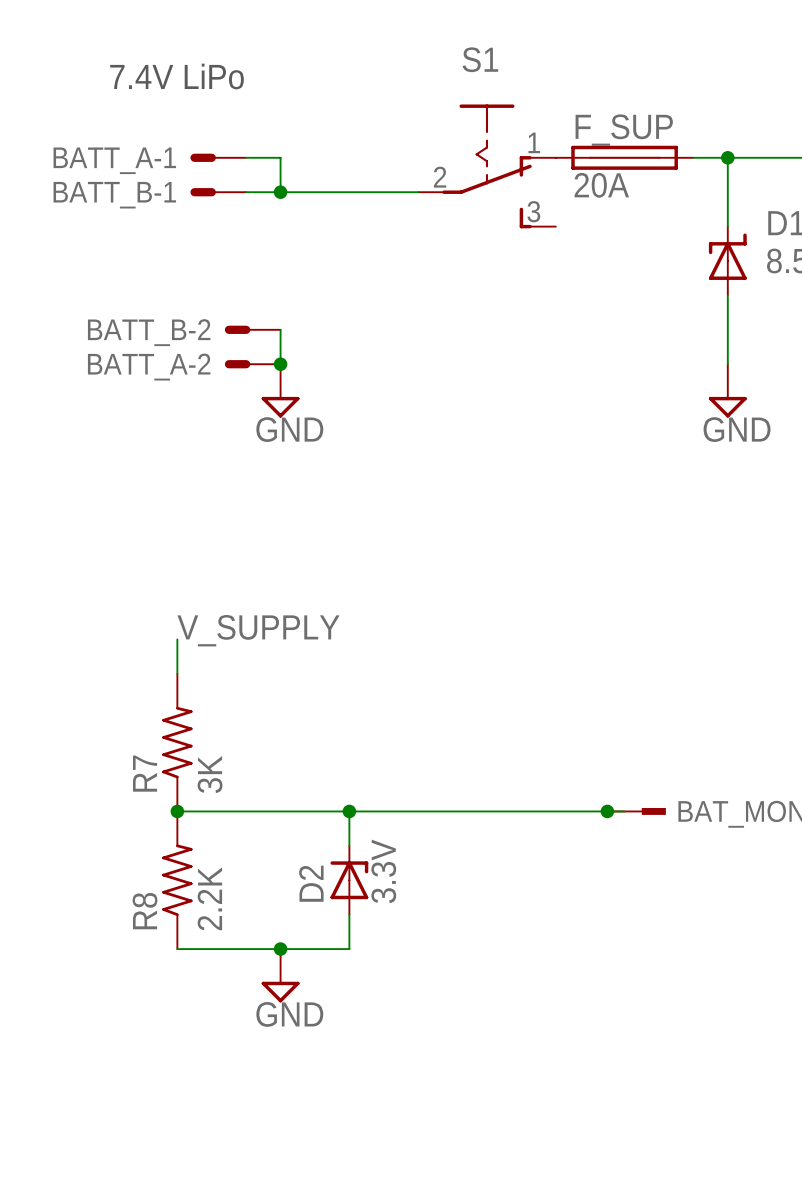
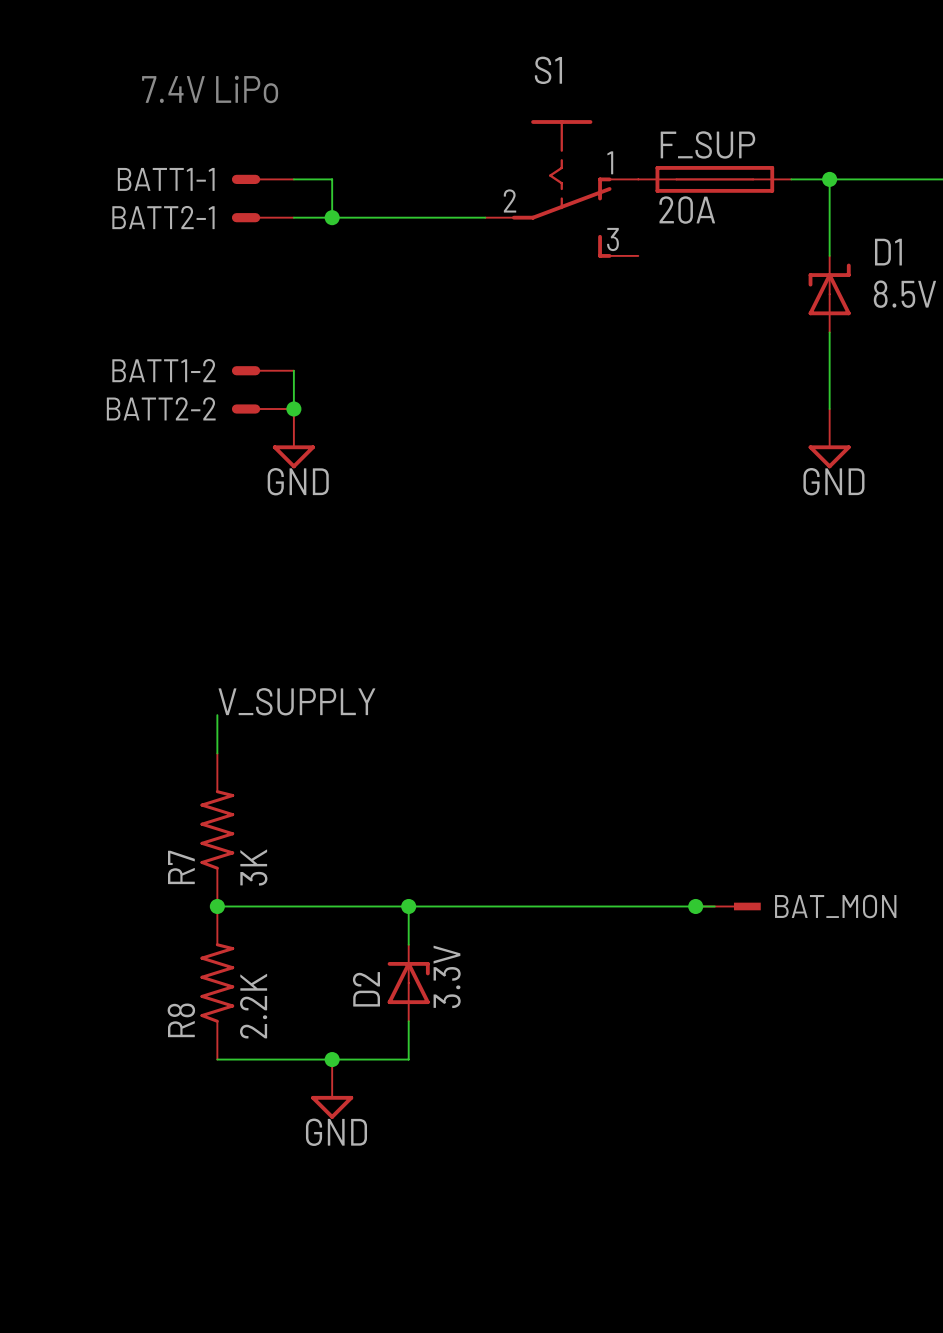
BATT_A-1 name: BATT_A-1 (114, 160) -> BATT1-1 (166, 179)
BATT_B-1 name: BATT_B-1 (114, 195) -> BATT2-1 (163, 217)
BATT1-2: none -> (262, 370)
BATT_B-2: (252, 329) -> none
wire: (280, 329) (280, 364) -> (293, 370) (293, 409)
BATT2-2: none -> (262, 409)
BATT_A-2: (252, 364) -> none
junction position: (280, 364) -> (293, 409)
power symbol position: GND (280, 390) -> GND (293, 438)

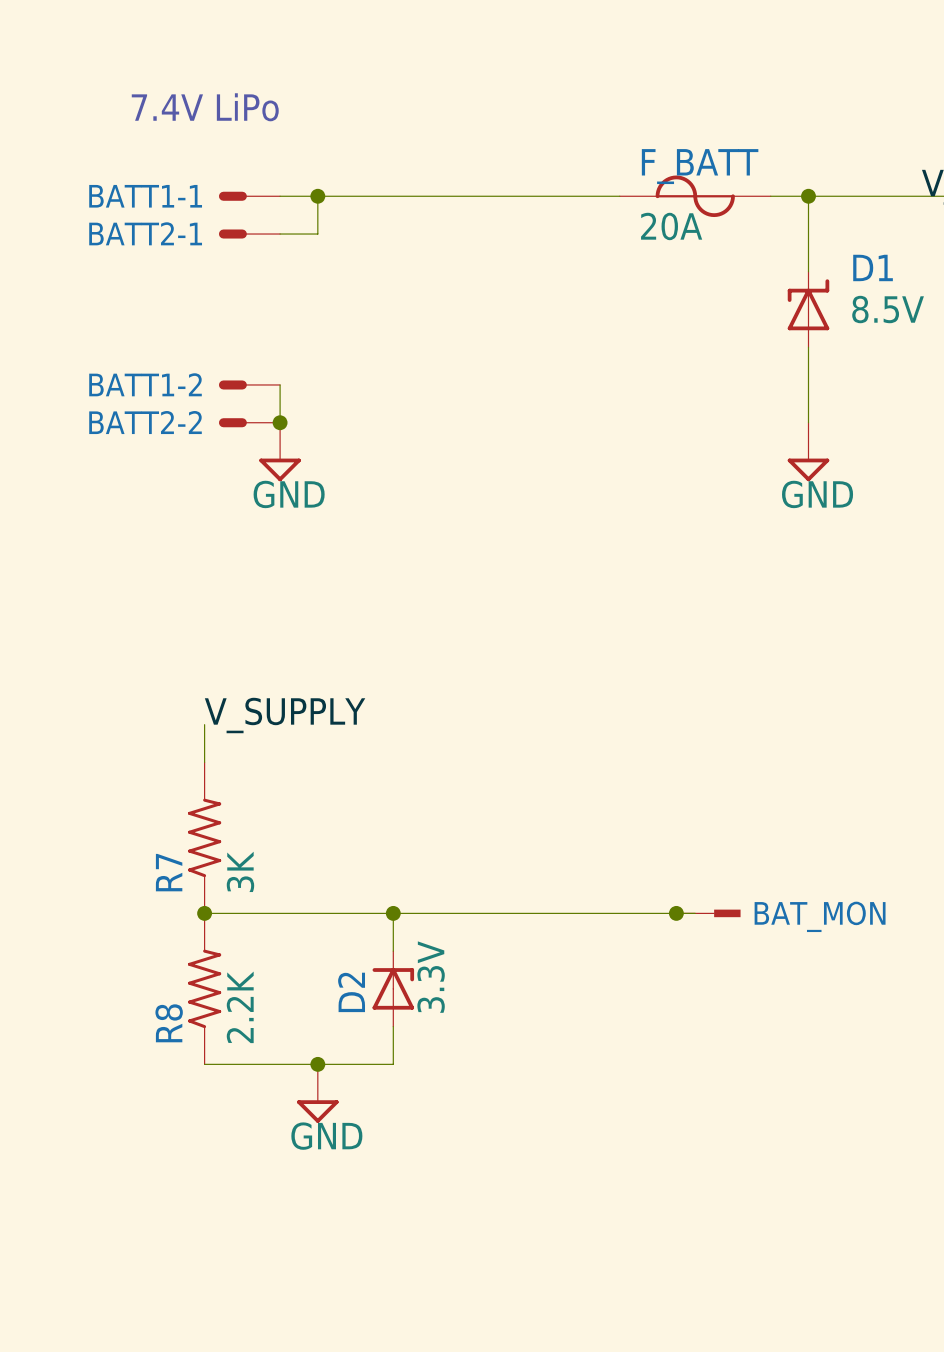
wire: none -> (317, 196) (619, 196)
F_SUP: 20A (714, 179) -> none
F_BATT: none -> 20A (695, 196)
S1: (561, 188) -> none
wire: (332, 217) (485, 217) -> none
junction position: (332, 217) -> (317, 196)

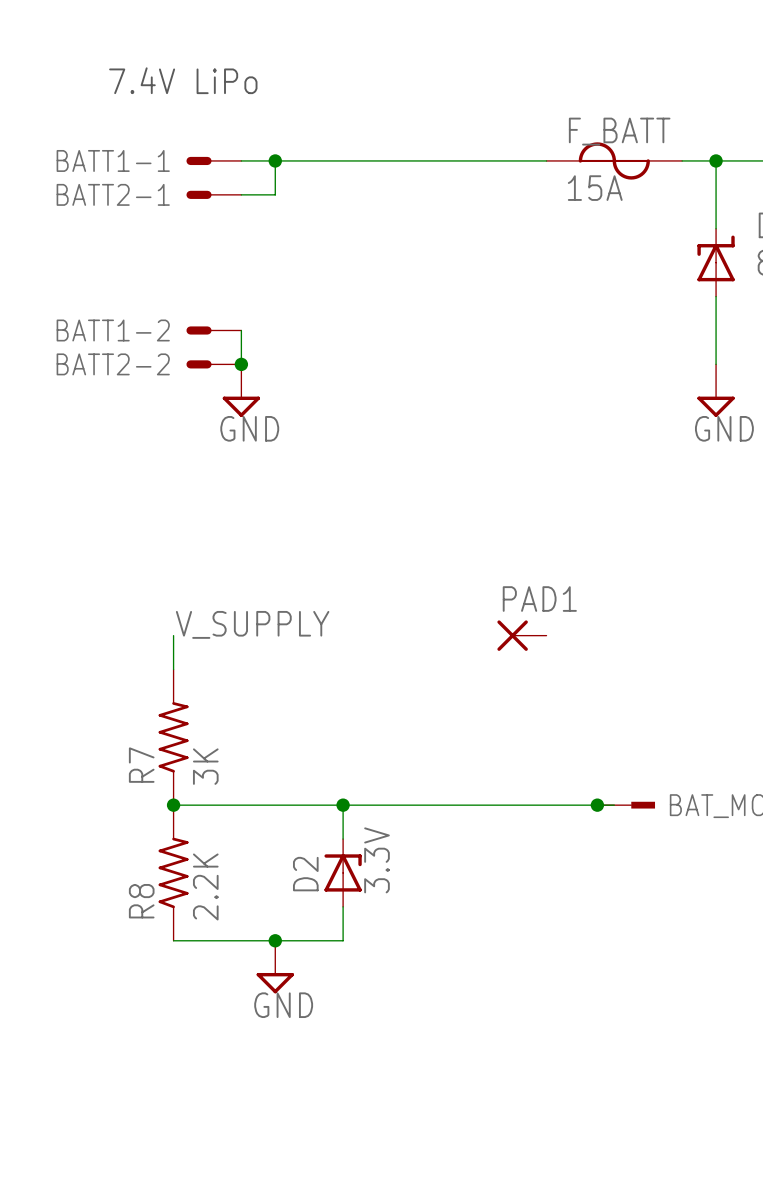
F_BATT value: 20A (671, 226) -> 15A (595, 188)
PAD1: none -> (521, 635)

